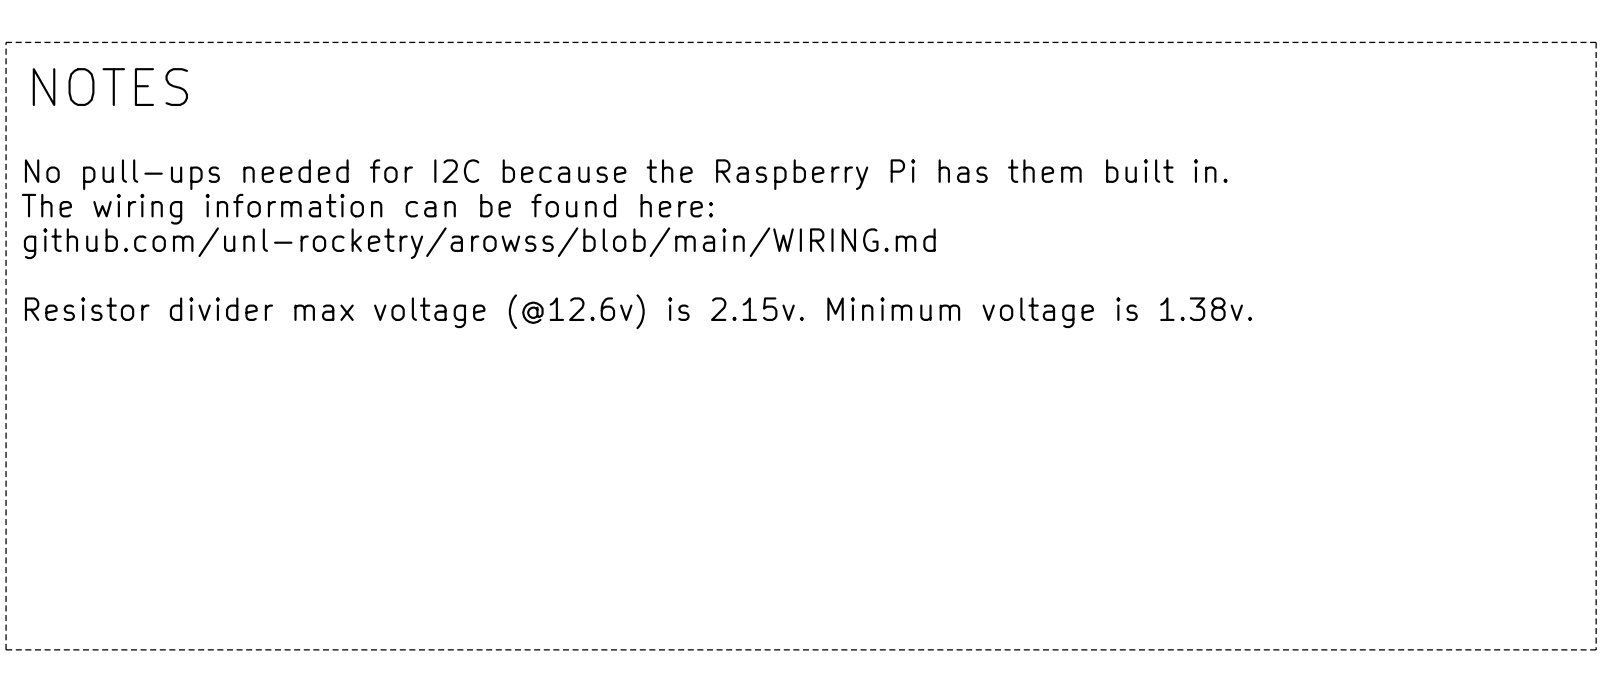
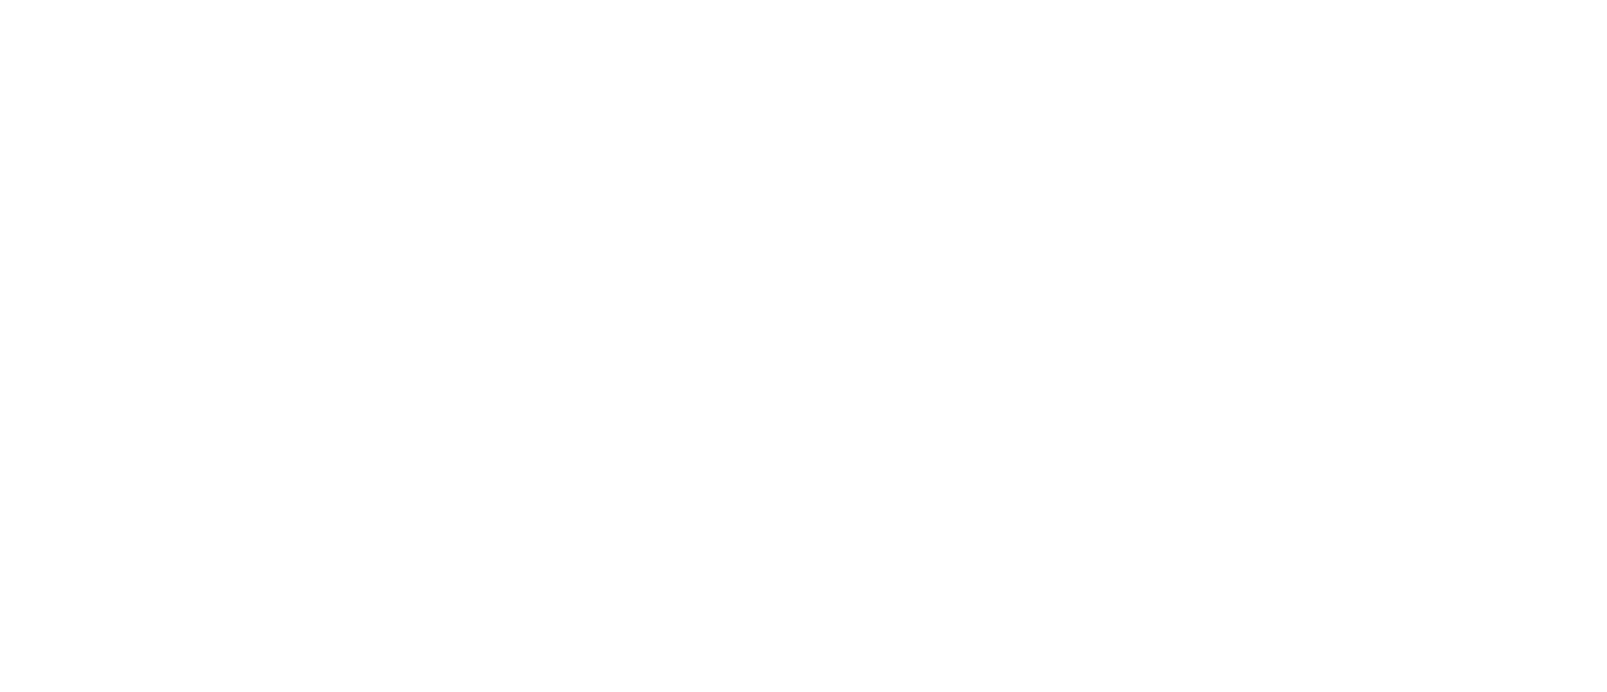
line: (6, 42) (1596, 42) (1596, 649) (6, 649) (6, 42) -> none
text: NOTES (110, 87) -> none
text: No pull-ups needed for I2C because the Raspberry Pi has them built in. (626, 174) -> none
text: The wiring information can be found here: (367, 209) -> none
text: github.com/unl-rocketry/arowss/blob/main/WIRING.md (479, 243) -> none
text: Resistor divider max voltage (@12.6v) is 2.15v. Minimum voltage is 1.38v. (638, 311) -> none

